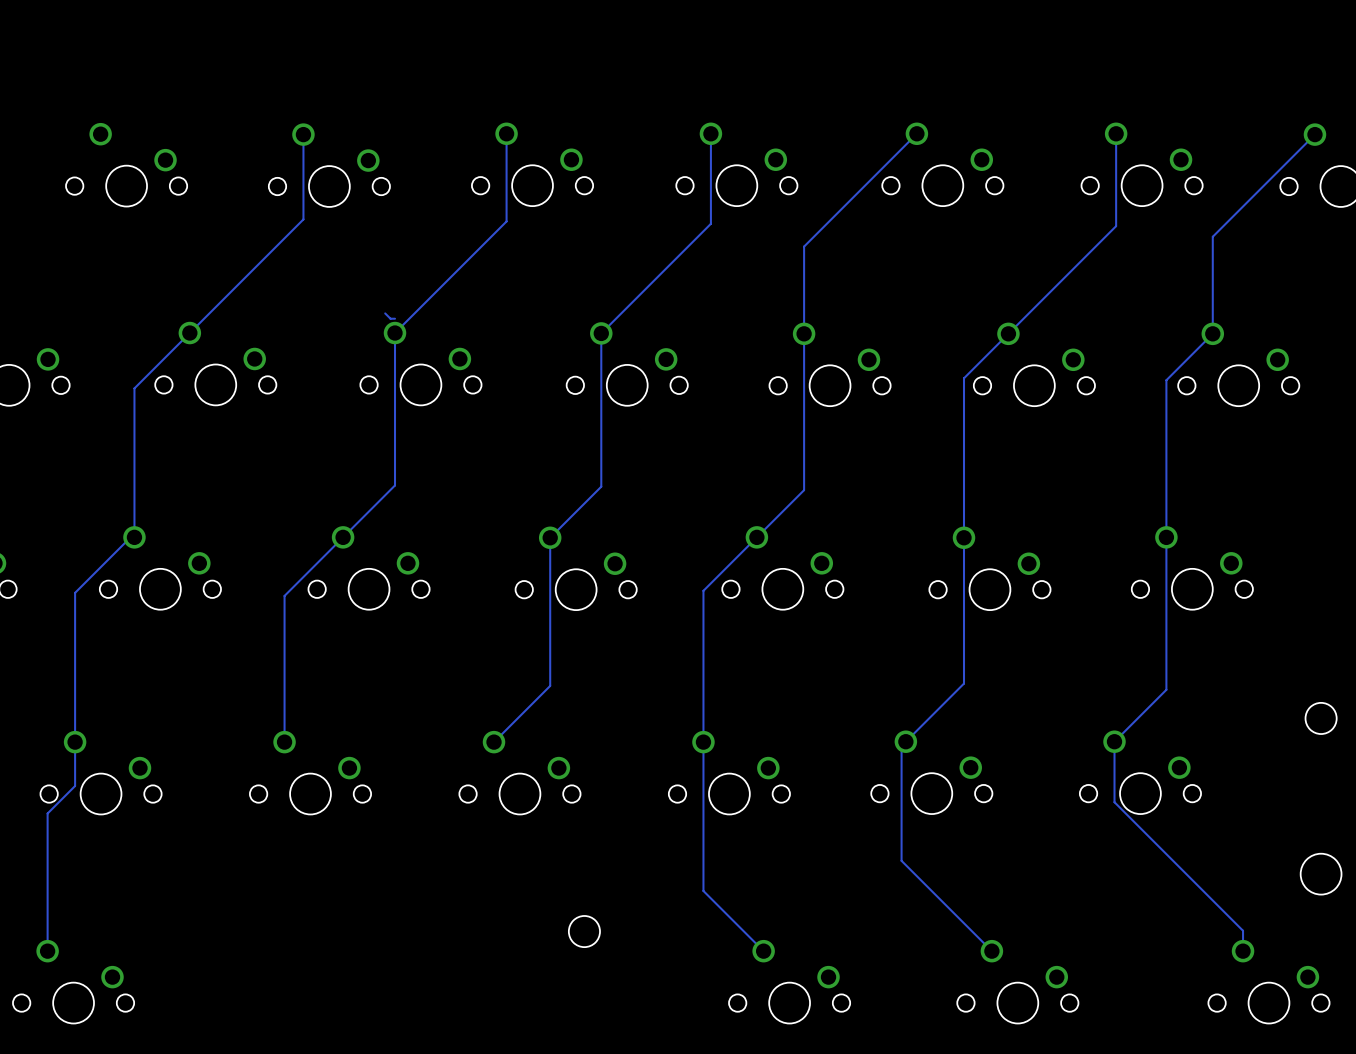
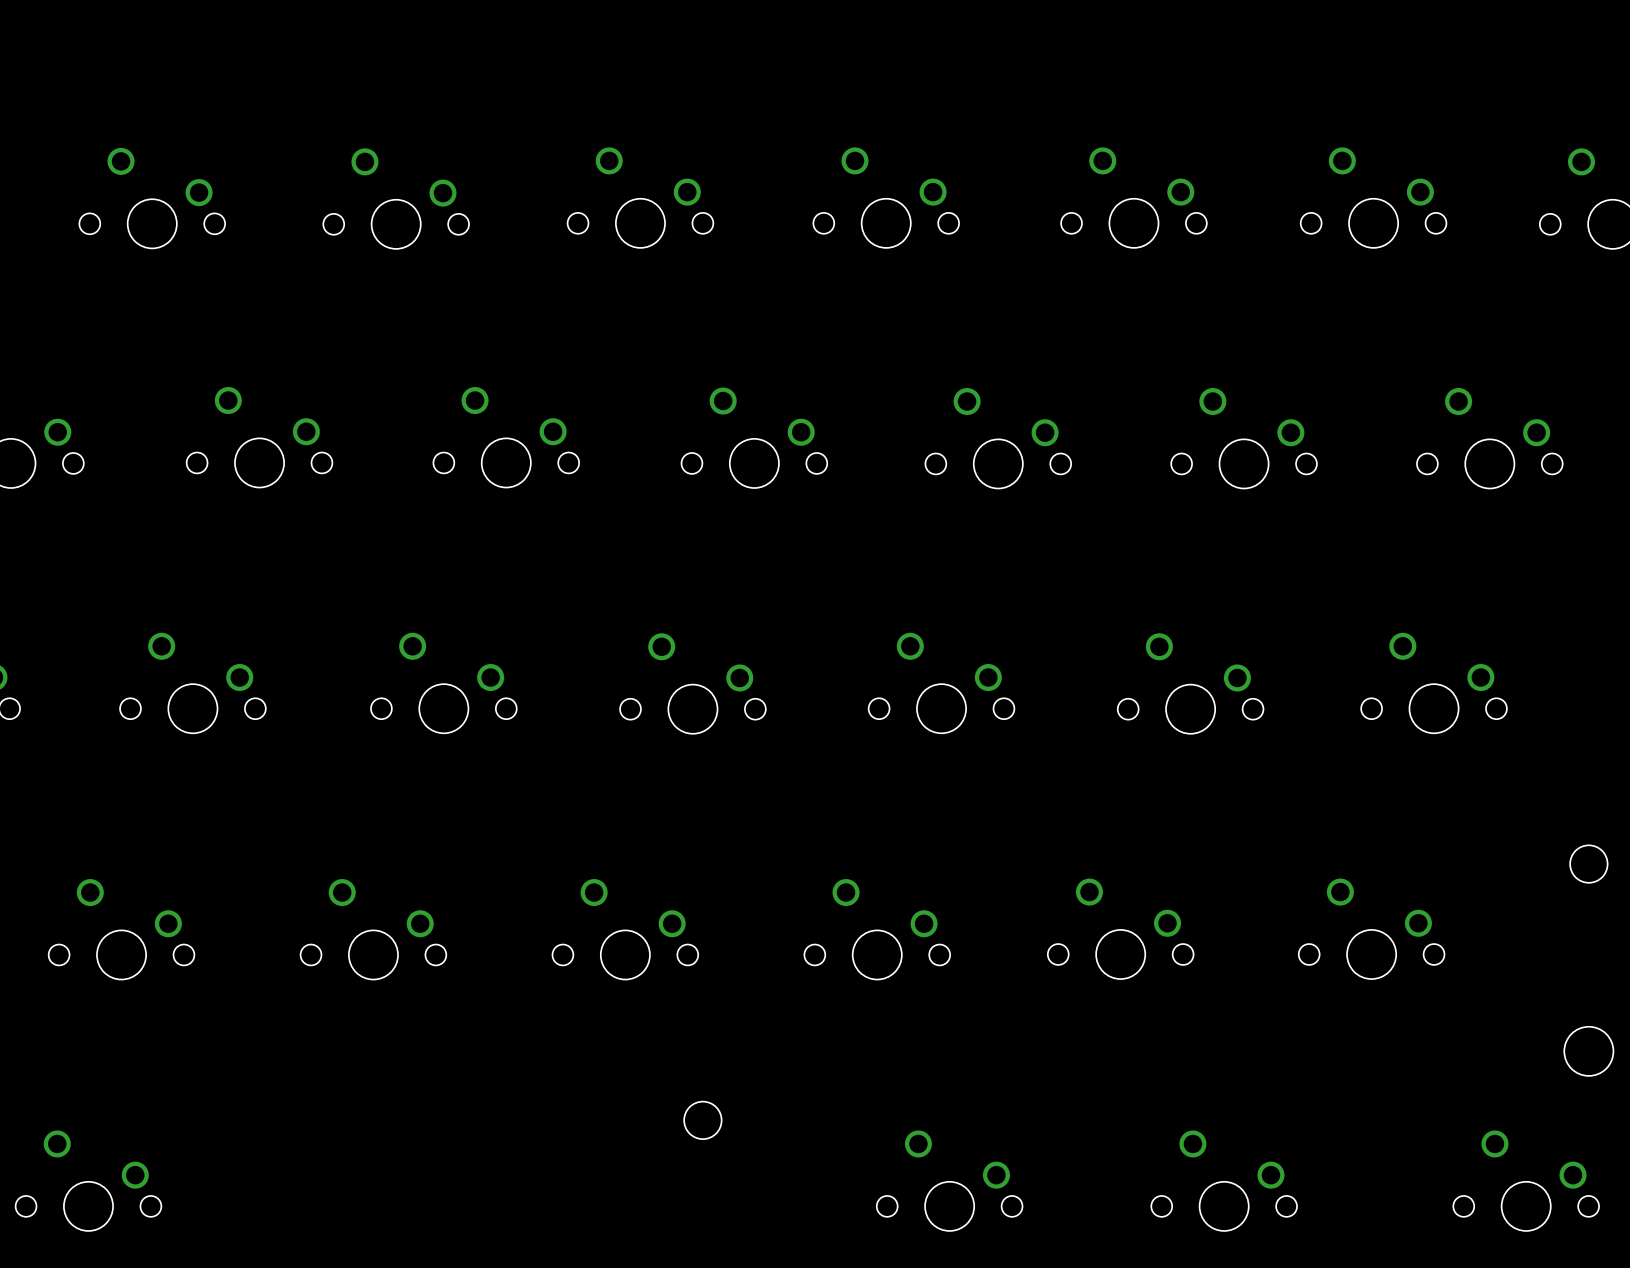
track: (506, 133) (506, 221) (395, 333) (395, 485) (284, 595) (284, 742) -> none
track: (710, 133) (710, 223) (601, 333) (601, 486) (550, 537) (550, 685) (494, 742) -> none
track: (916, 133) (804, 246) (804, 490) (703, 590) (703, 890) (763, 951) -> none
track: (1116, 133) (1116, 226) (964, 378) (964, 683) (901, 746) (901, 860) (991, 951) -> none
track: (303, 134) (303, 219) (134, 388) (134, 537) -> none
track: (1314, 134) (1212, 236) (1212, 333) (1166, 380) (1166, 689) (1114, 741) (1114, 802) (1243, 930) (1243, 951) -> none
track: (385, 313) (390, 318) (395, 318) -> none
track: (134, 533) (75, 592) (75, 786) (47, 813) (47, 951) -> none

